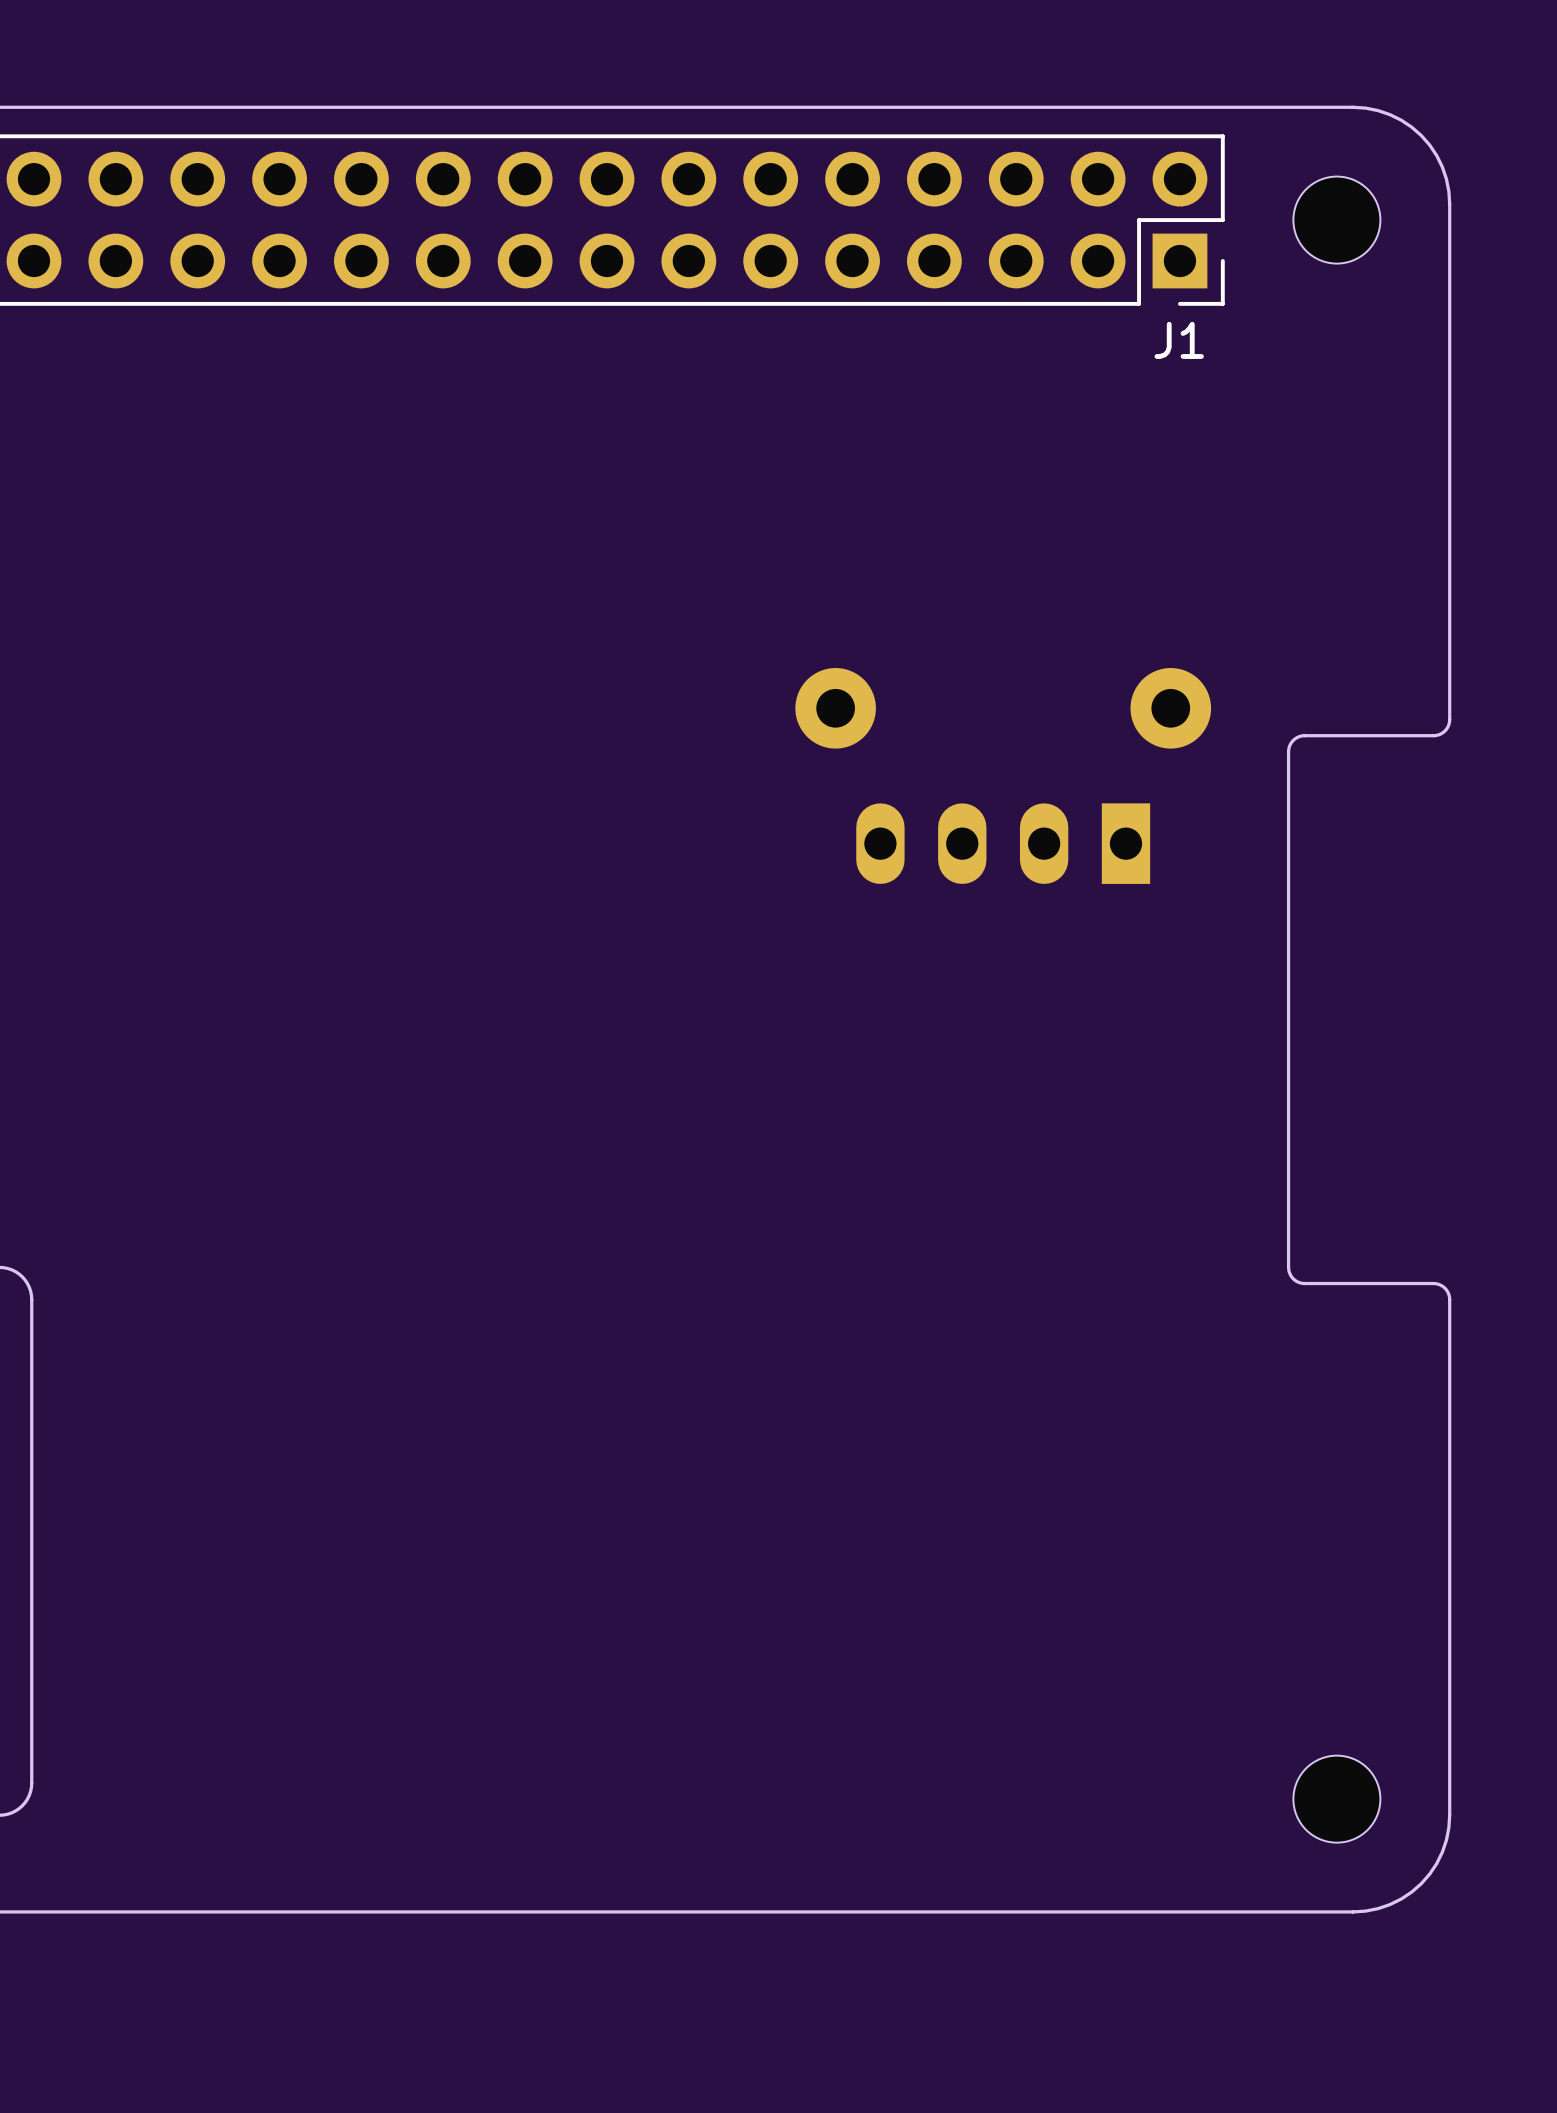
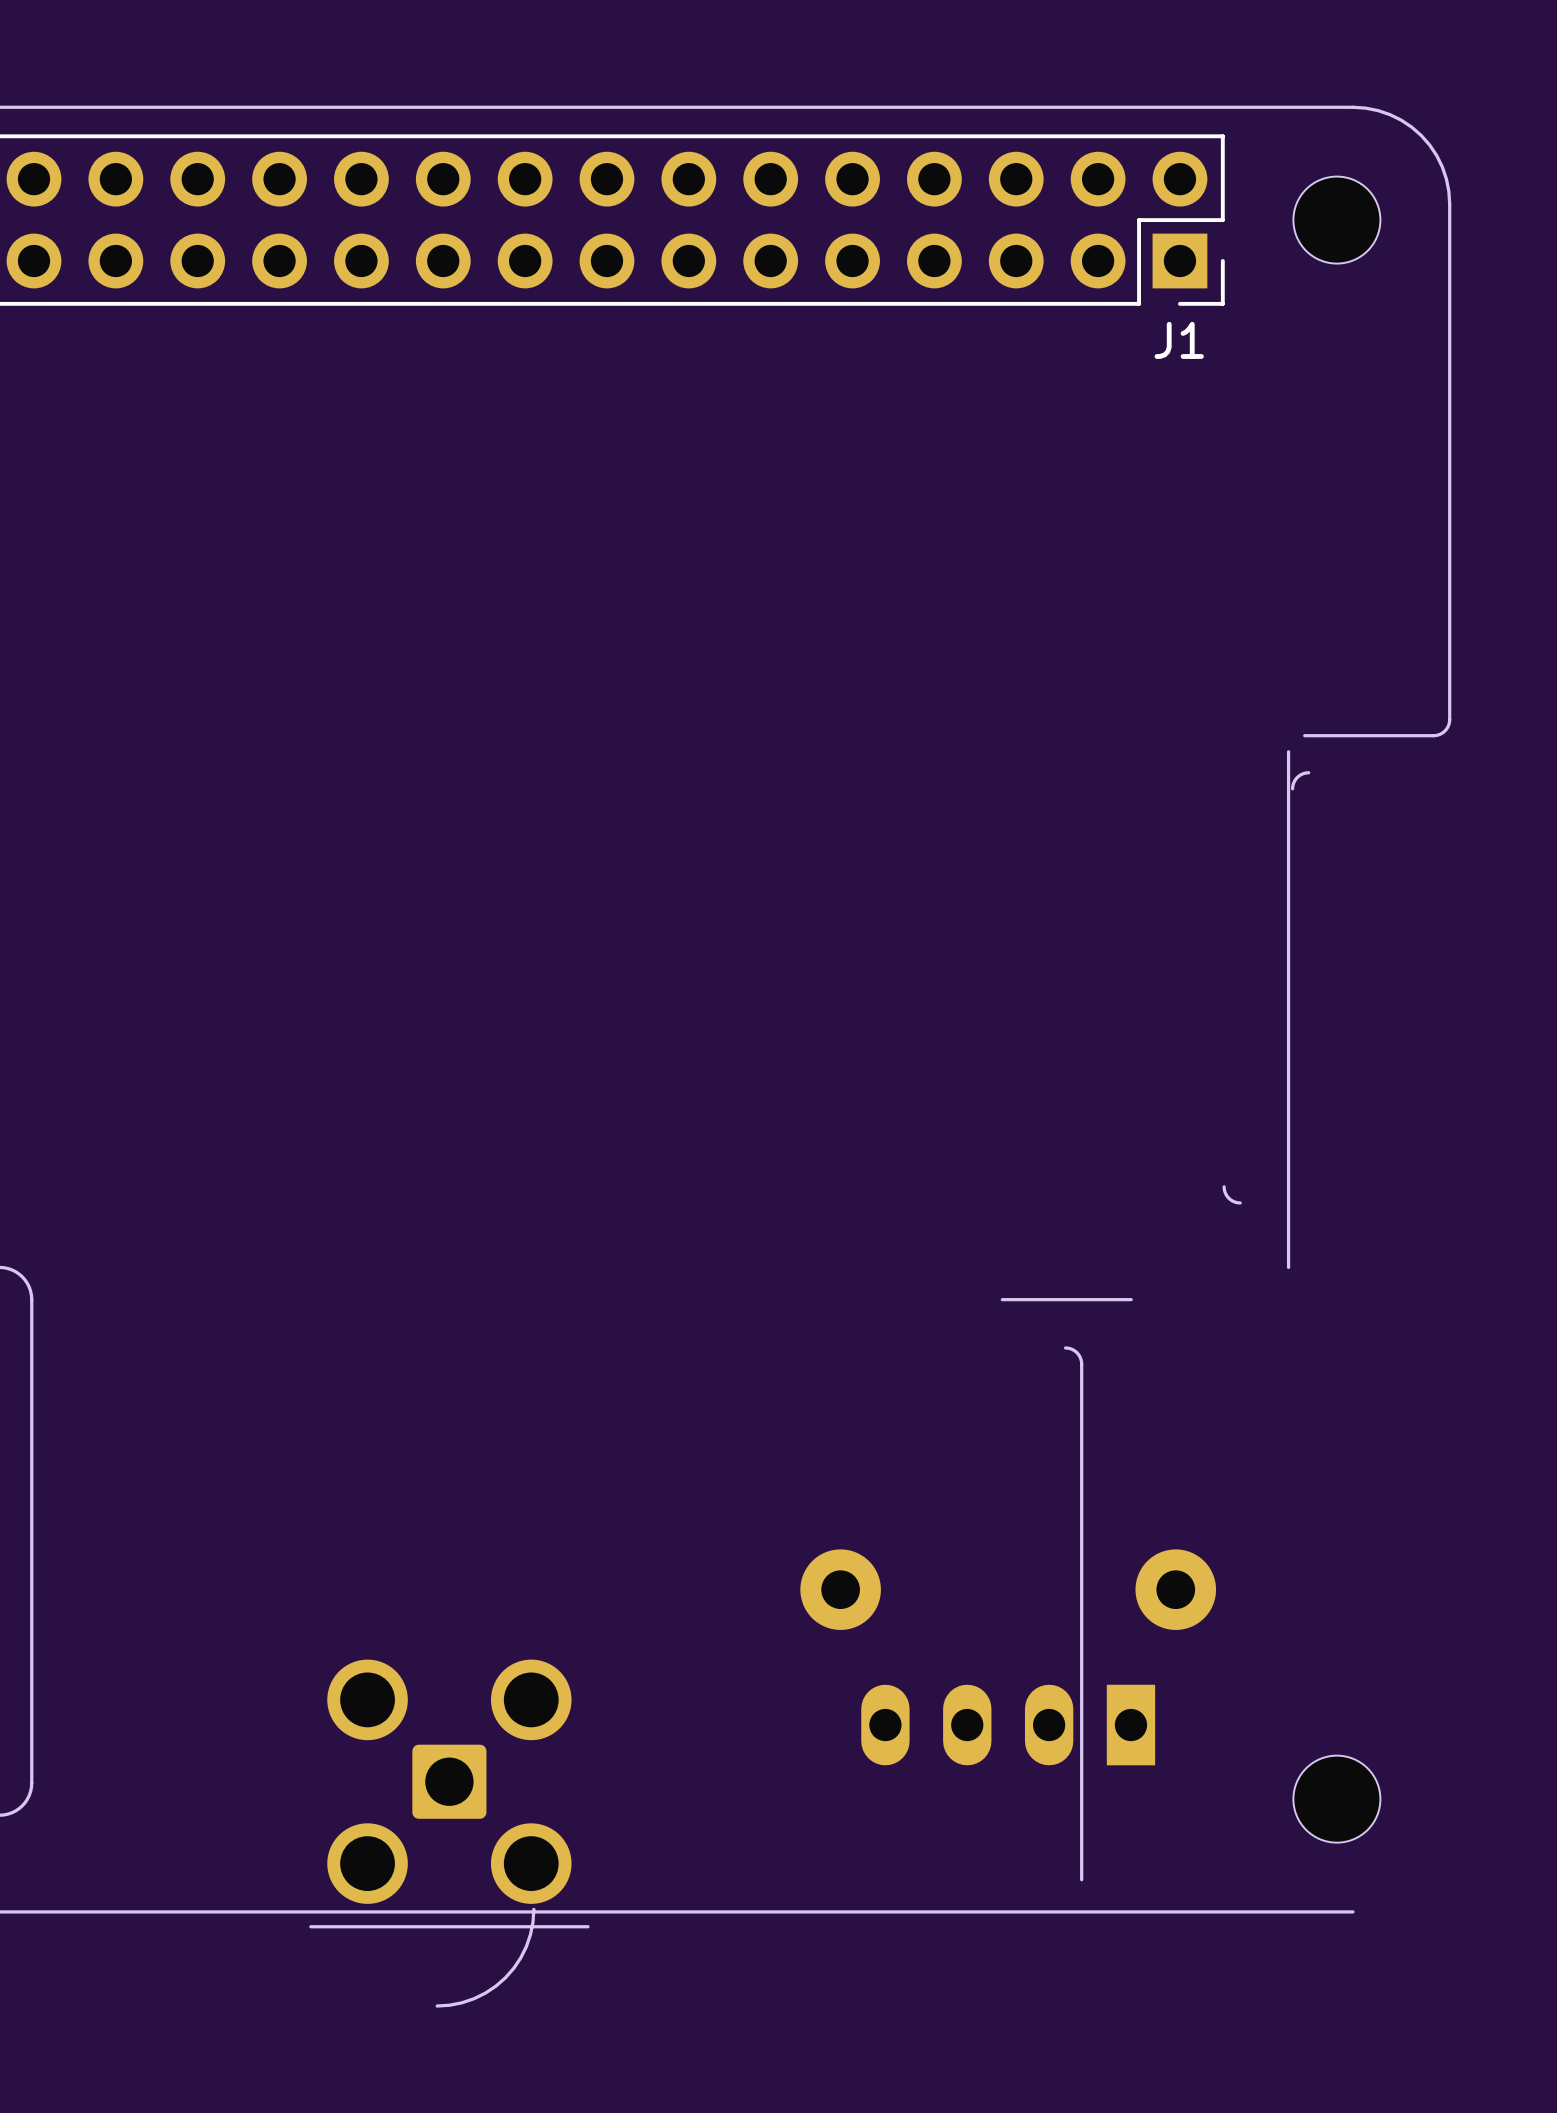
board edge: (1304, 735) (1293, 740) (1288, 751) -> (1308, 772) (1297, 777) (1292, 788)
part: (1003, 775) -> none
board edge: none -> (1224, 1186) (1228, 1198) (1240, 1202)
board edge: (1288, 1267) (1291, 1277) (1302, 1283) (1435, 1283) (1444, 1288) (1449, 1297) (1448, 1827) (1446, 1840) (1436, 1863) (1421, 1883) (1411, 1891) (1390, 1904) (1378, 1908) (1353, 1911) -> none
board edge: none -> (1131, 1299) (1002, 1299)
board edge: none -> (1065, 1347) (1076, 1352) (1081, 1364) (1081, 1879)
part: none -> (1008, 1657)
part: none -> (449, 1793)
board edge: none -> (533, 1909) (530, 1934) (526, 1946) (513, 1968) (505, 1977) (485, 1993) (474, 1998) (462, 2002) (437, 2006)

